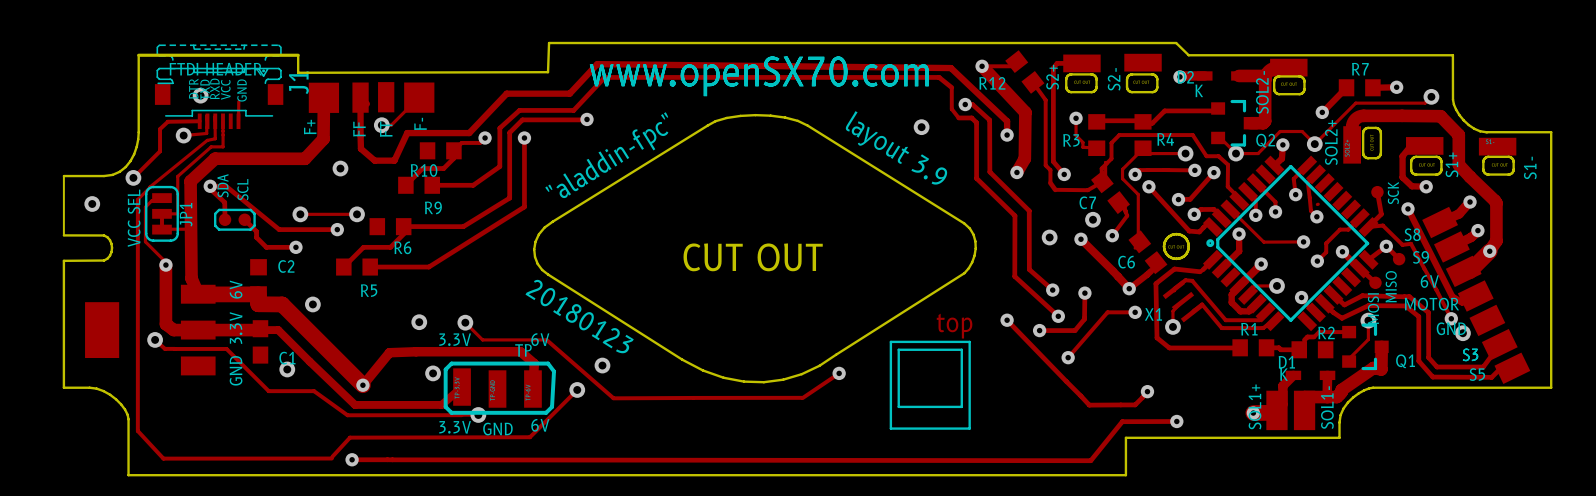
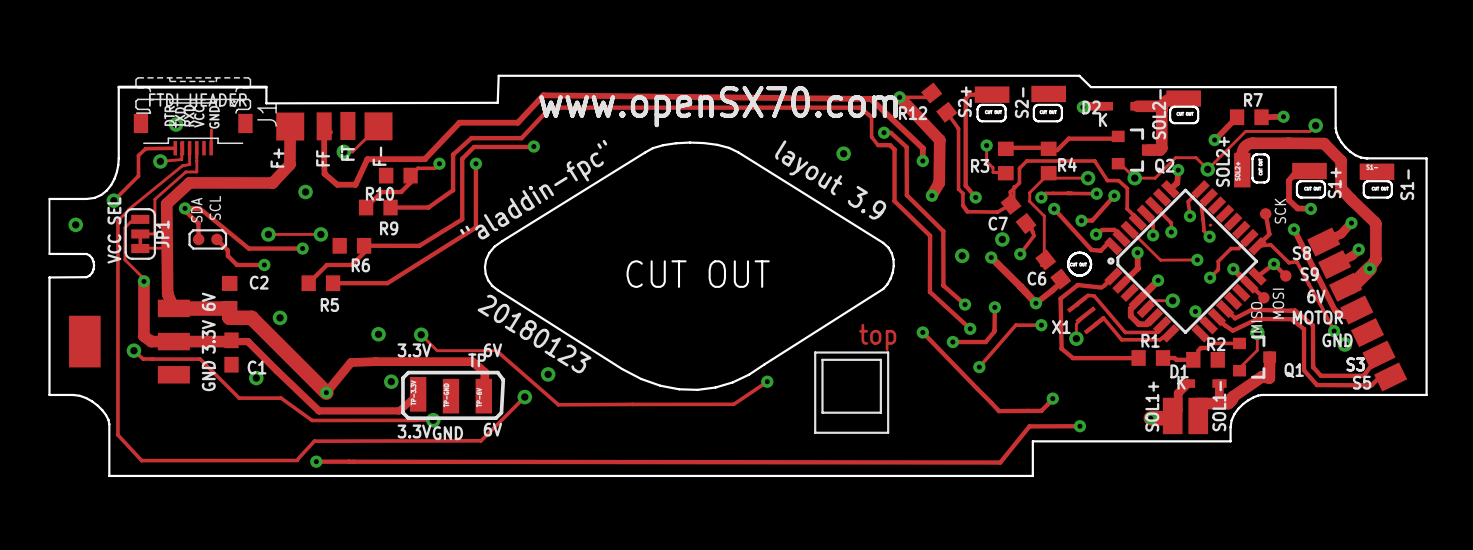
MISO name: MISO (1391, 286) -> MOSI (1278, 303)
MOSI name: MOSI (1373, 308) -> MISO (1256, 317)

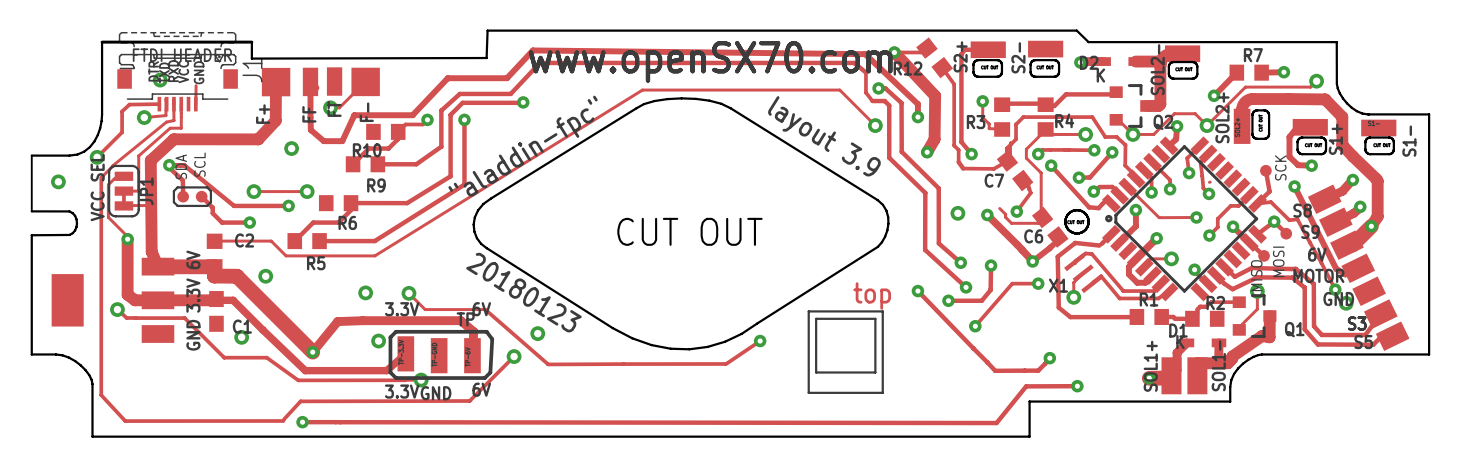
via position: (843, 153) -> (875, 125)
track: none -> (875, 125) (839, 90) (642, 90) (374, 255) (286, 255) (271, 241) (214, 241)
via: (1002, 239) -> none
track: none -> (999, 208) (1011, 223) (1038, 223)

